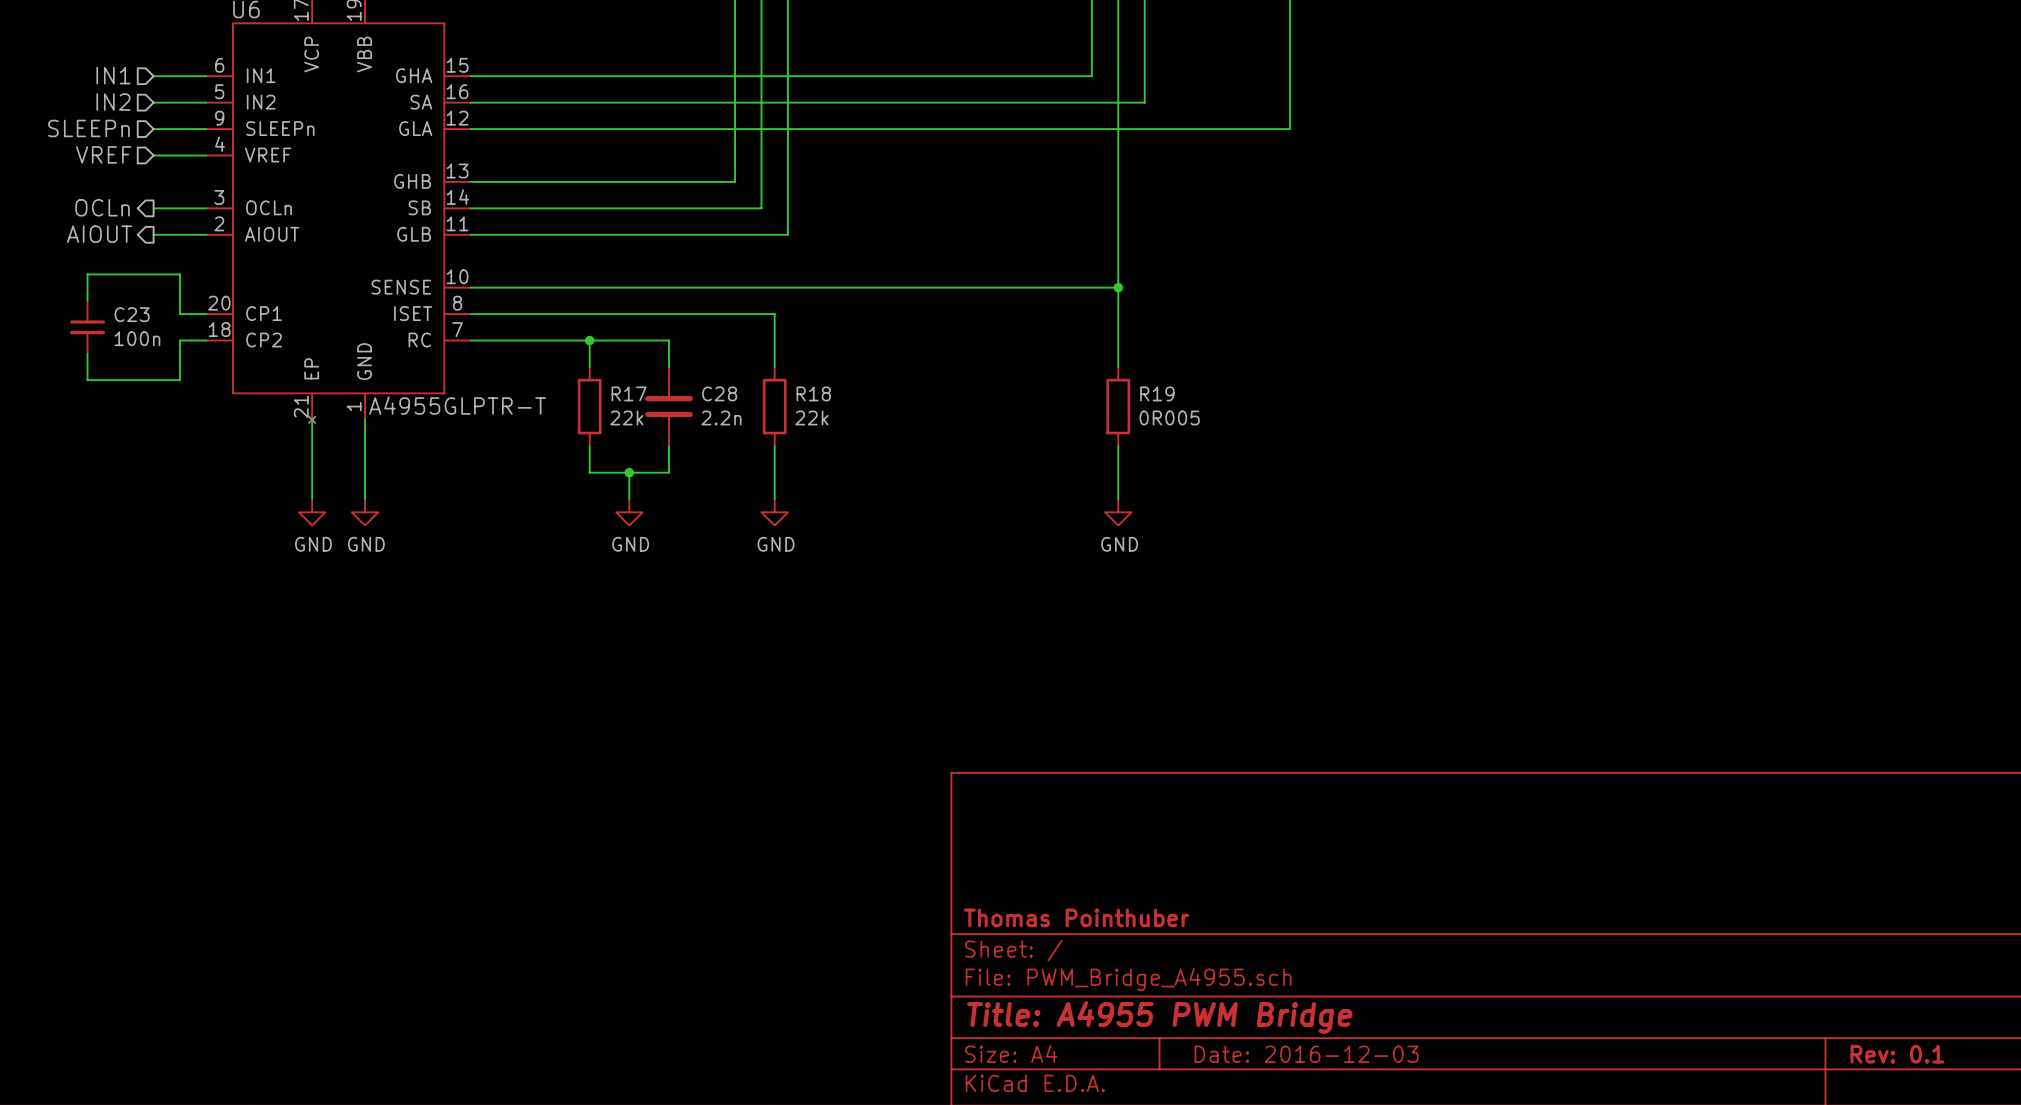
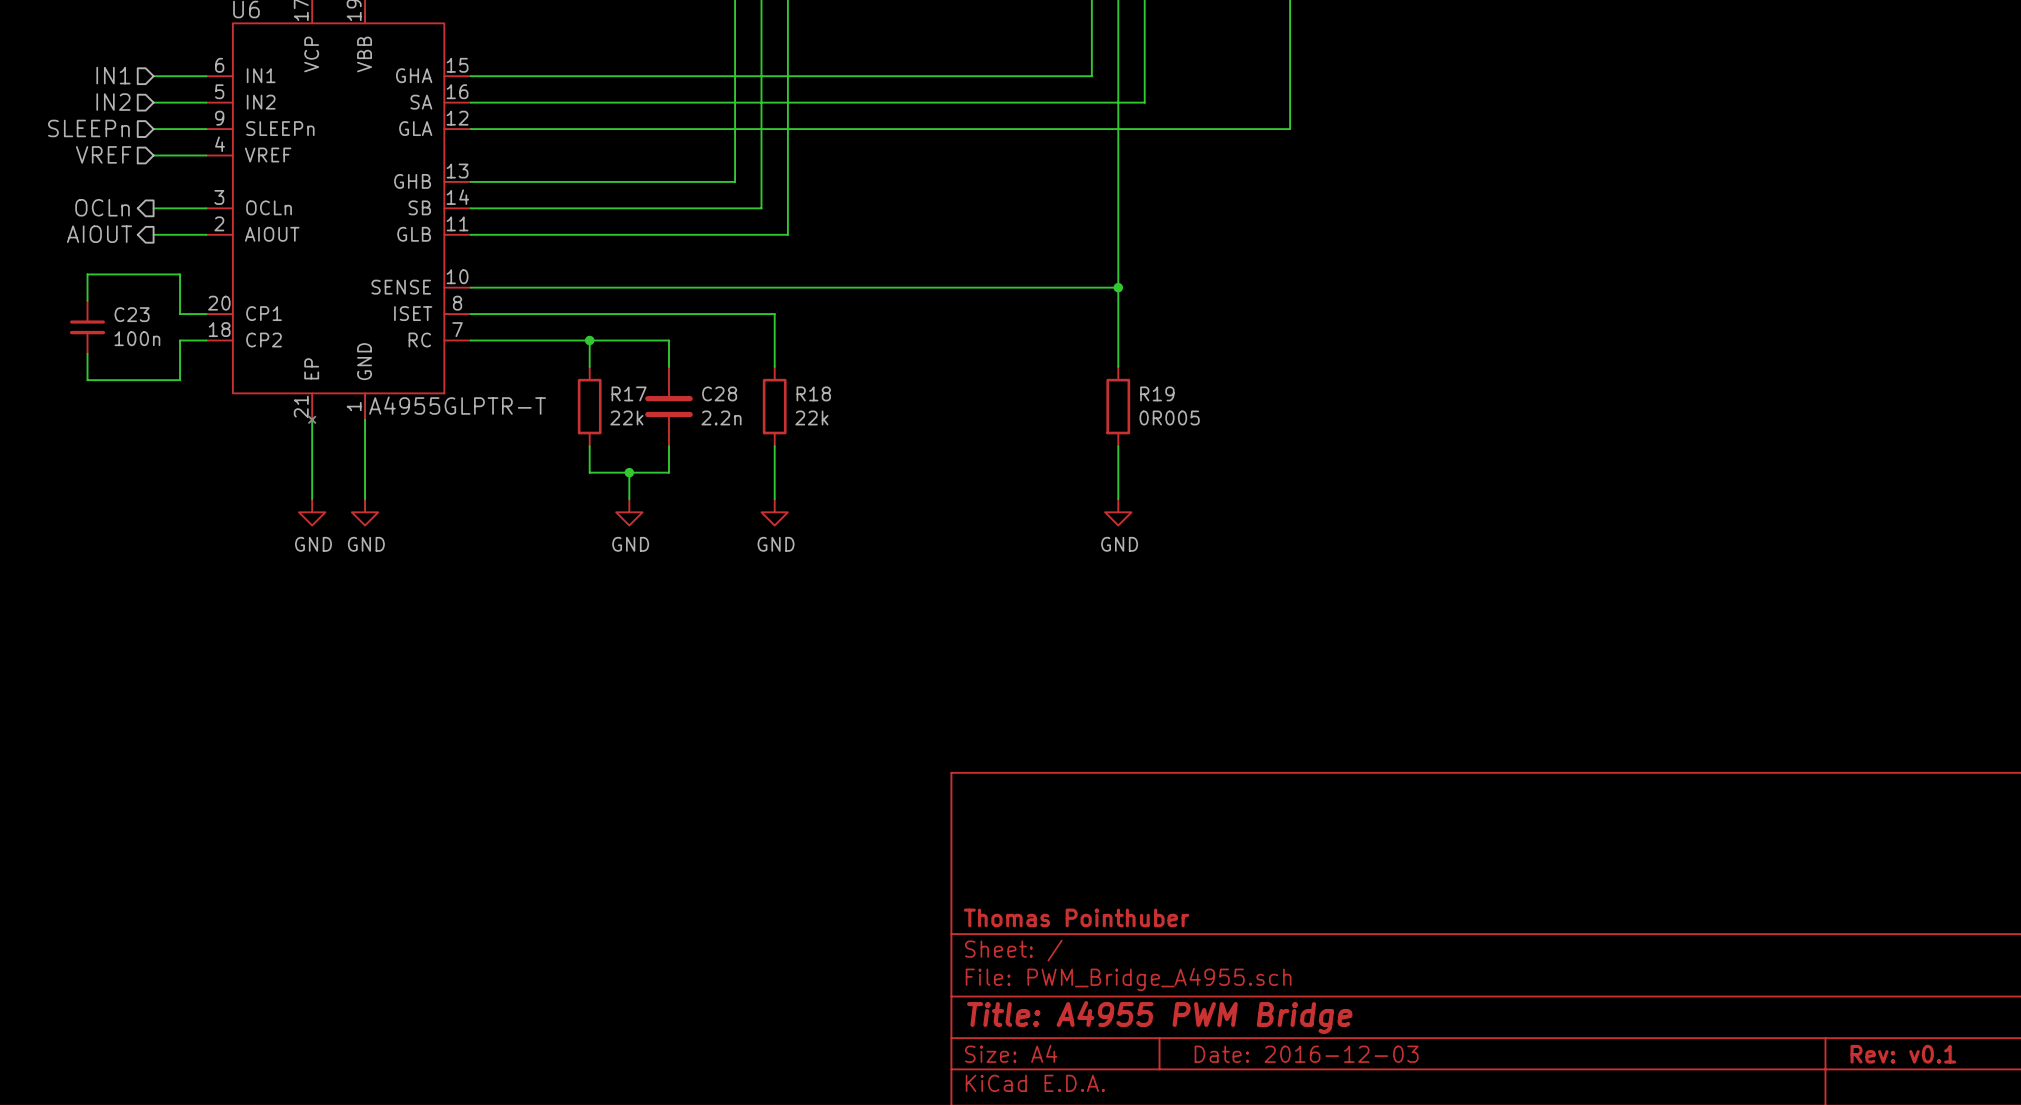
title block: Rev: 0.1 (1897, 1054) -> Rev: v0.1 (1903, 1054)

